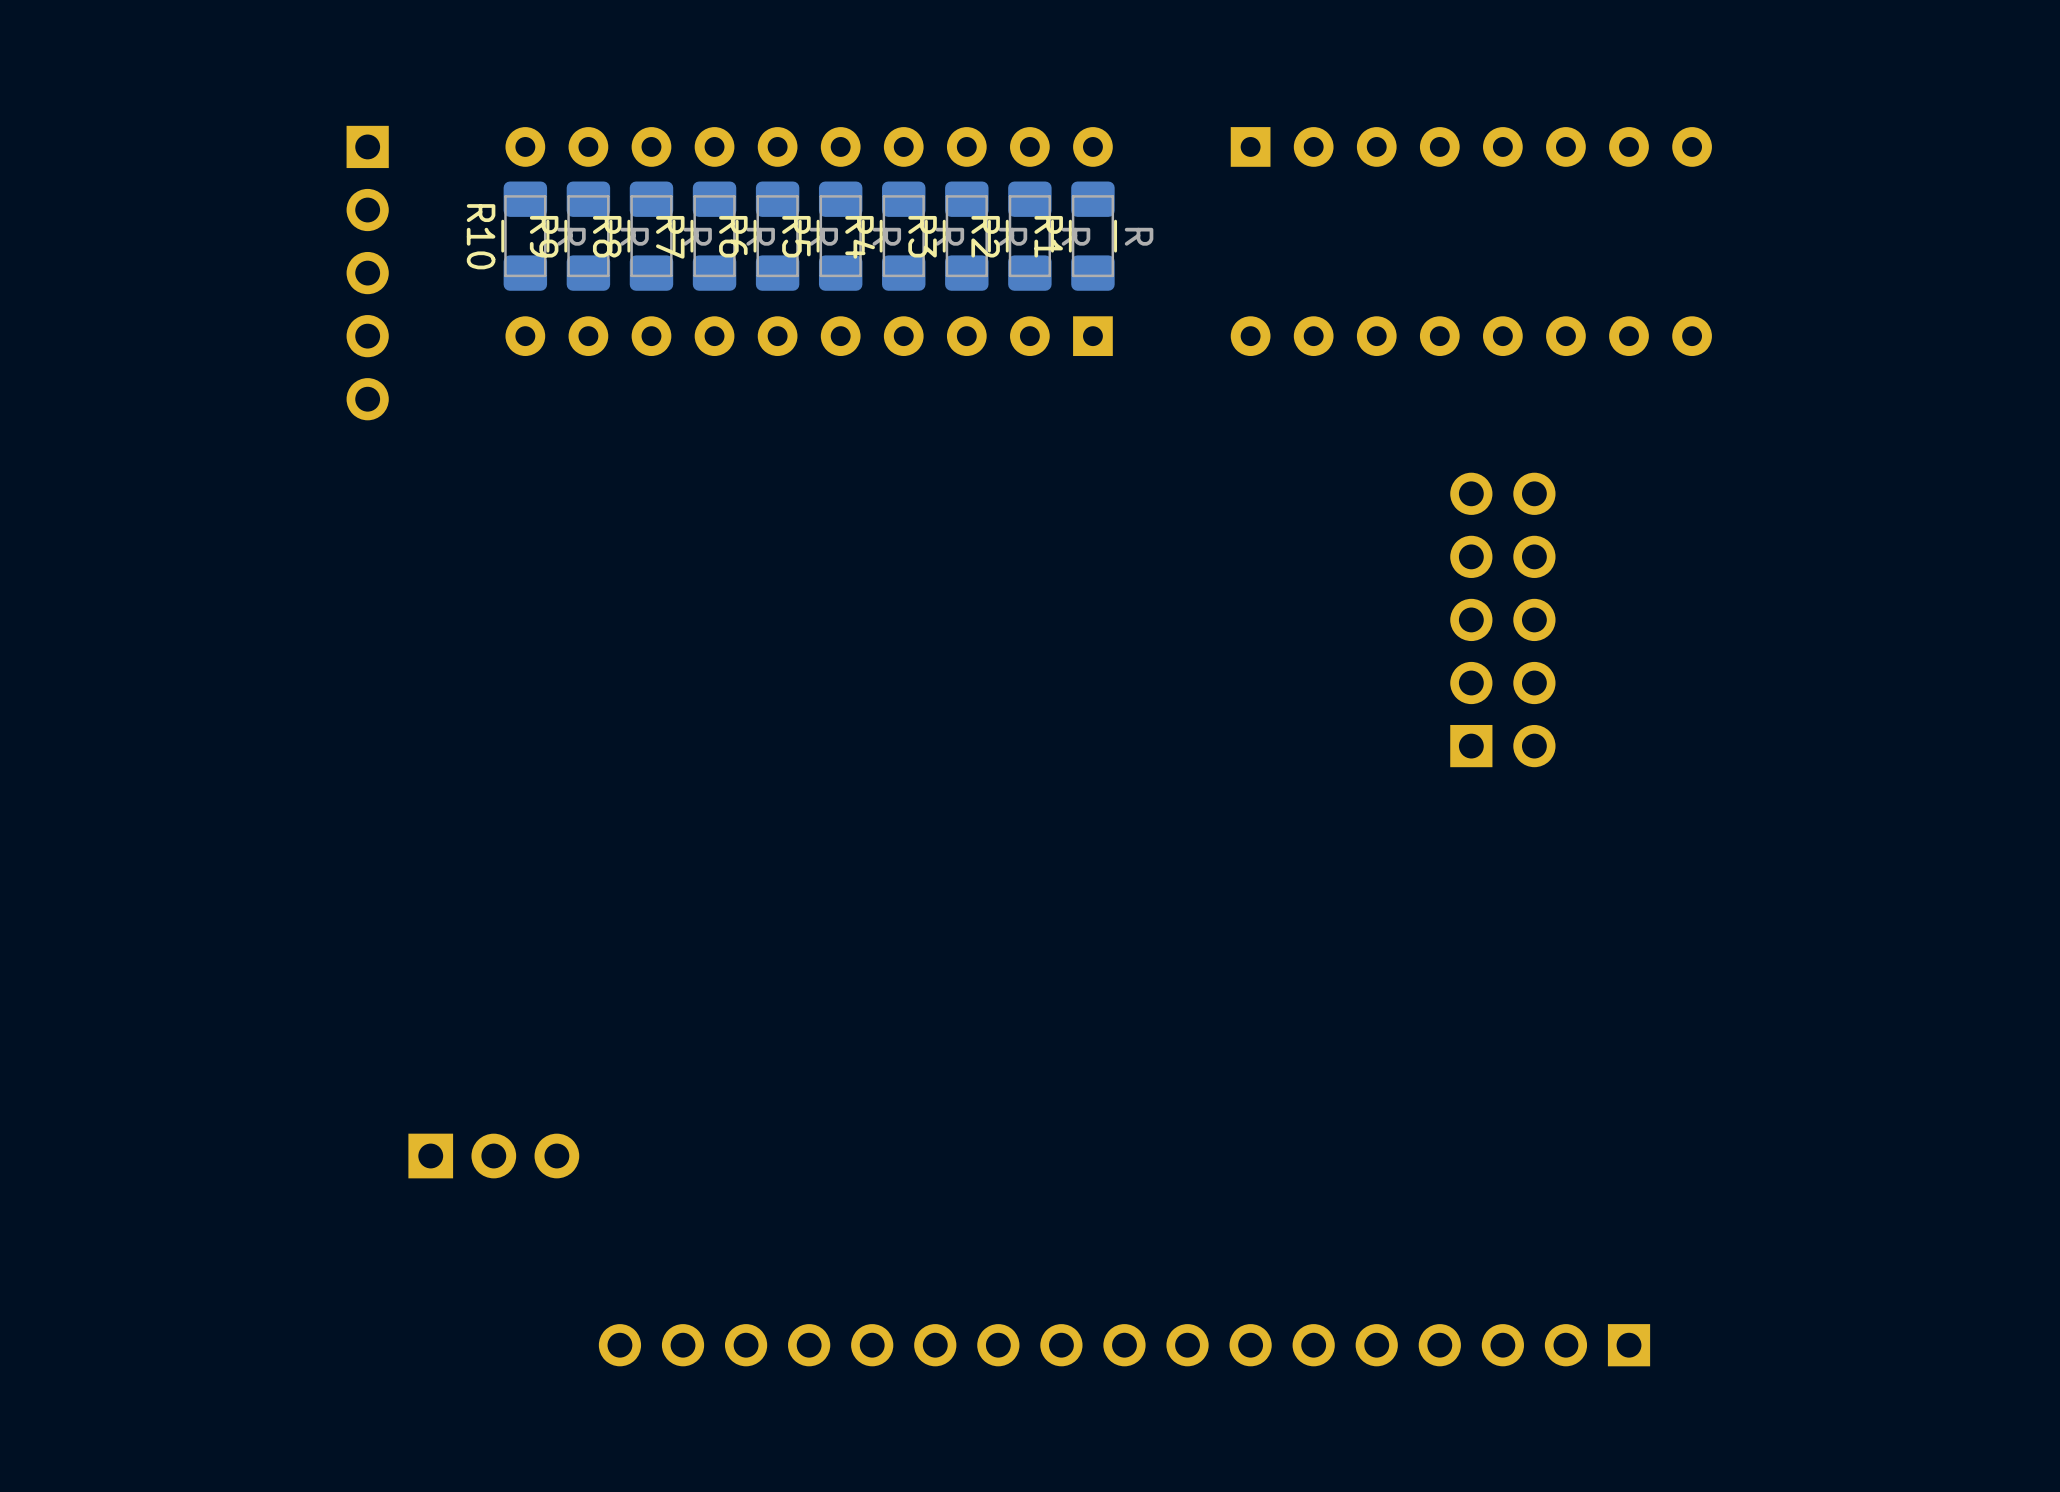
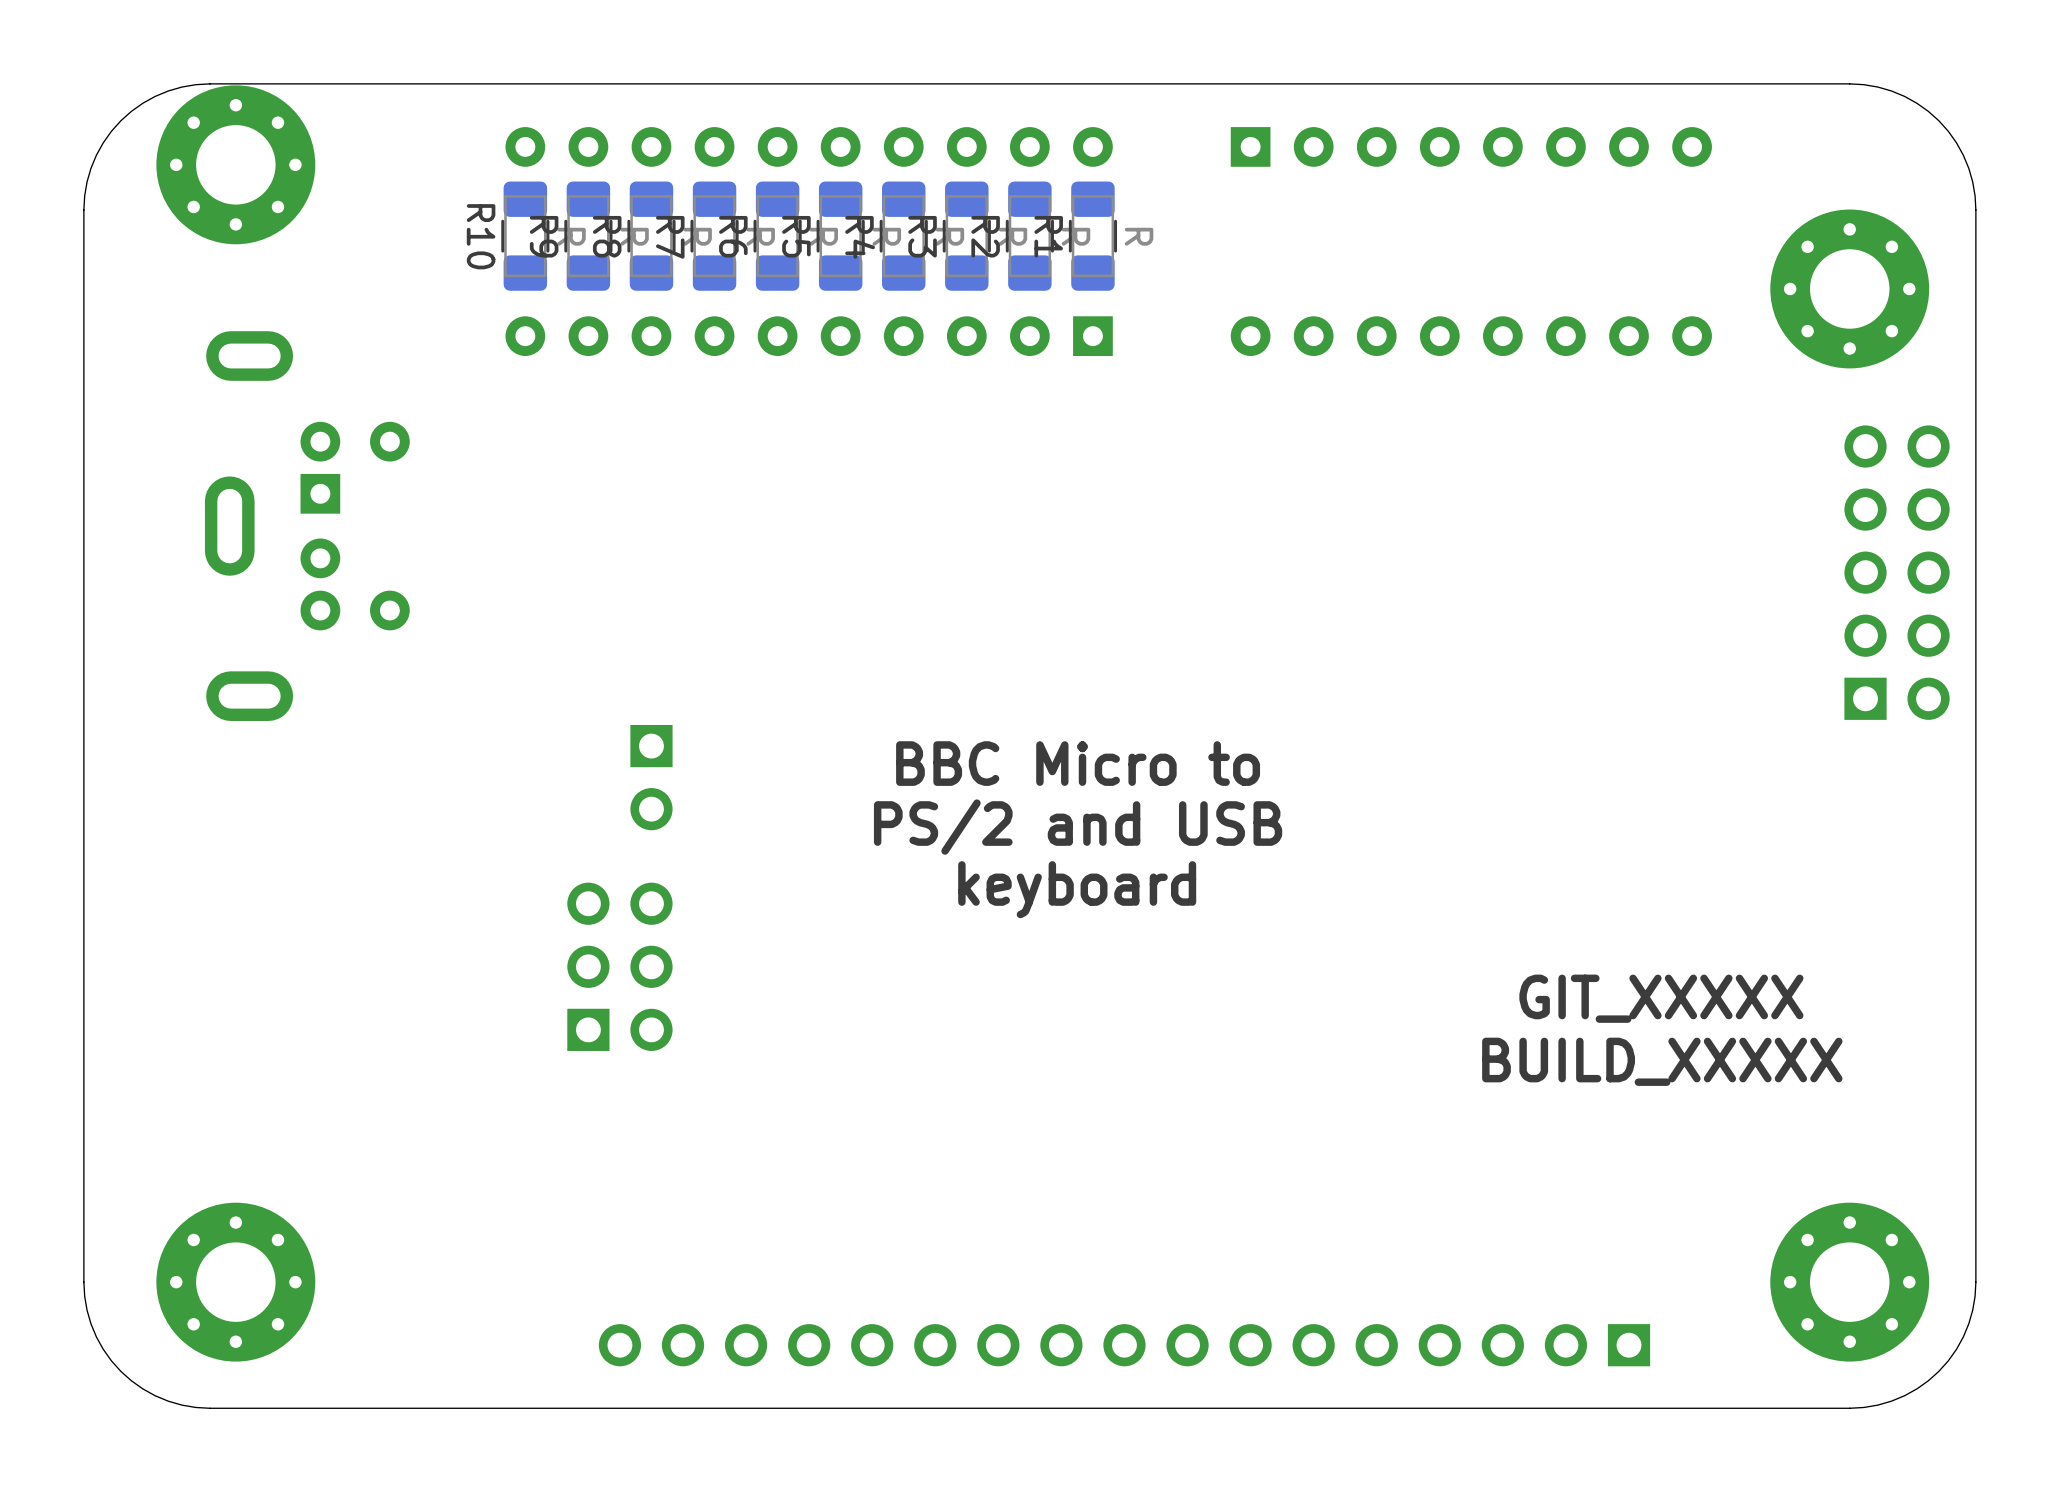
board edge: none -> (1849, 83) (210, 83) (195, 84) (168, 90) (155, 96) (131, 111) (111, 131) (96, 155) (87, 181) (83, 210) (83, 1282) (84, 1296) (90, 1323) (103, 1349) (111, 1360) (131, 1380) (155, 1395) (181, 1405) (210, 1408) (1849, 1408) (1863, 1407) (1891, 1401) (1916, 1388) (1928, 1380) (1948, 1360) (1963, 1336) (1972, 1310) (1975, 1282) (1975, 195) (1972, 181) (1963, 155) (1956, 142) (1938, 120) (1916, 103) (1891, 90) (1863, 84) (1849, 83)
part: none -> (235, 164)
part: (367, 273) -> none
part: none -> (1849, 288)
part: none -> (307, 526)
part position: (1502, 619) -> (1897, 572)
text: none -> BBC Micro to (1078, 763)
part: none -> (651, 777)
text: none -> PS/2 and USB (1078, 827)
text: none -> keyboard (1077, 889)
part: none -> (619, 966)
text: none -> GIT_XXXXX (1661, 998)
text: none -> BUILD_XXXXX (1662, 1061)
part: (493, 1156) -> none
part: none -> (235, 1282)
part: none -> (1849, 1282)

